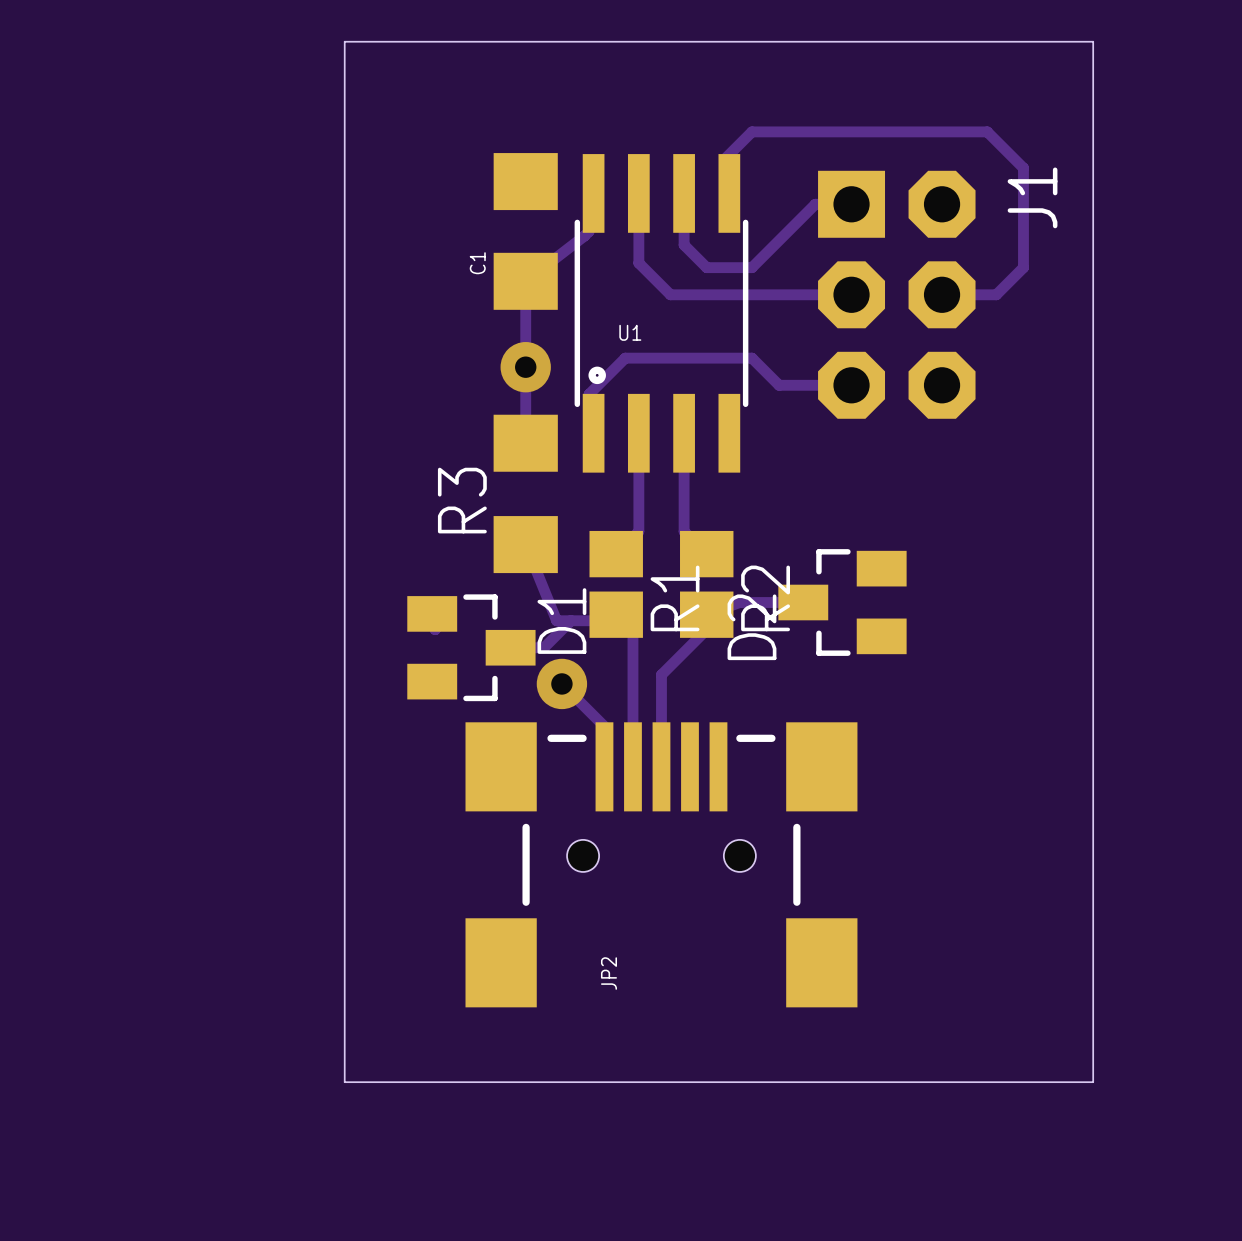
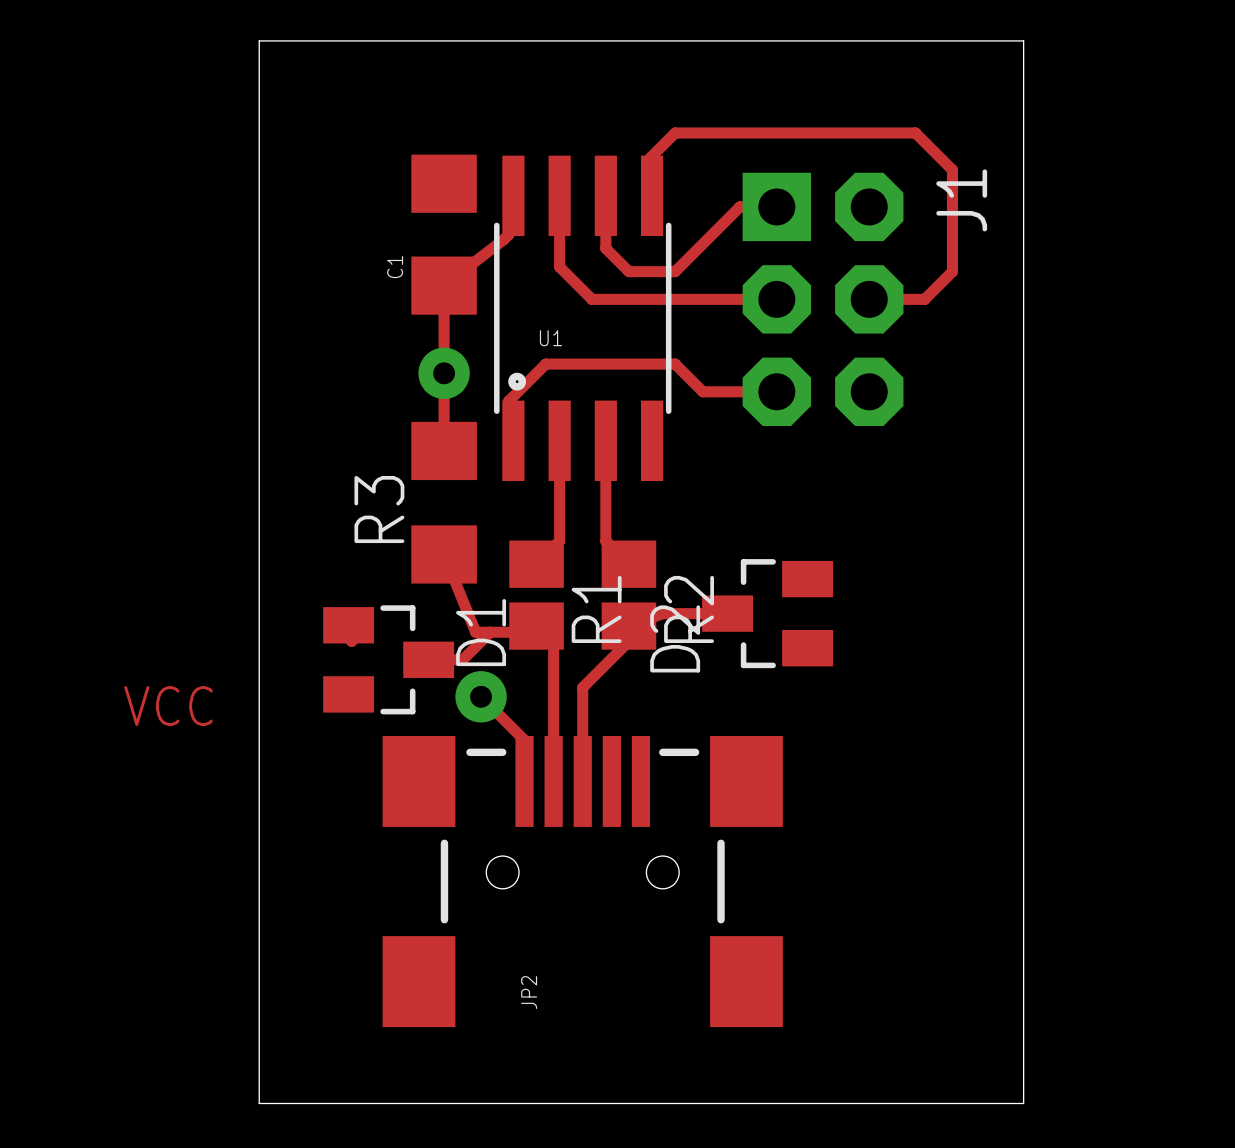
text: none -> VCC (168, 706)

